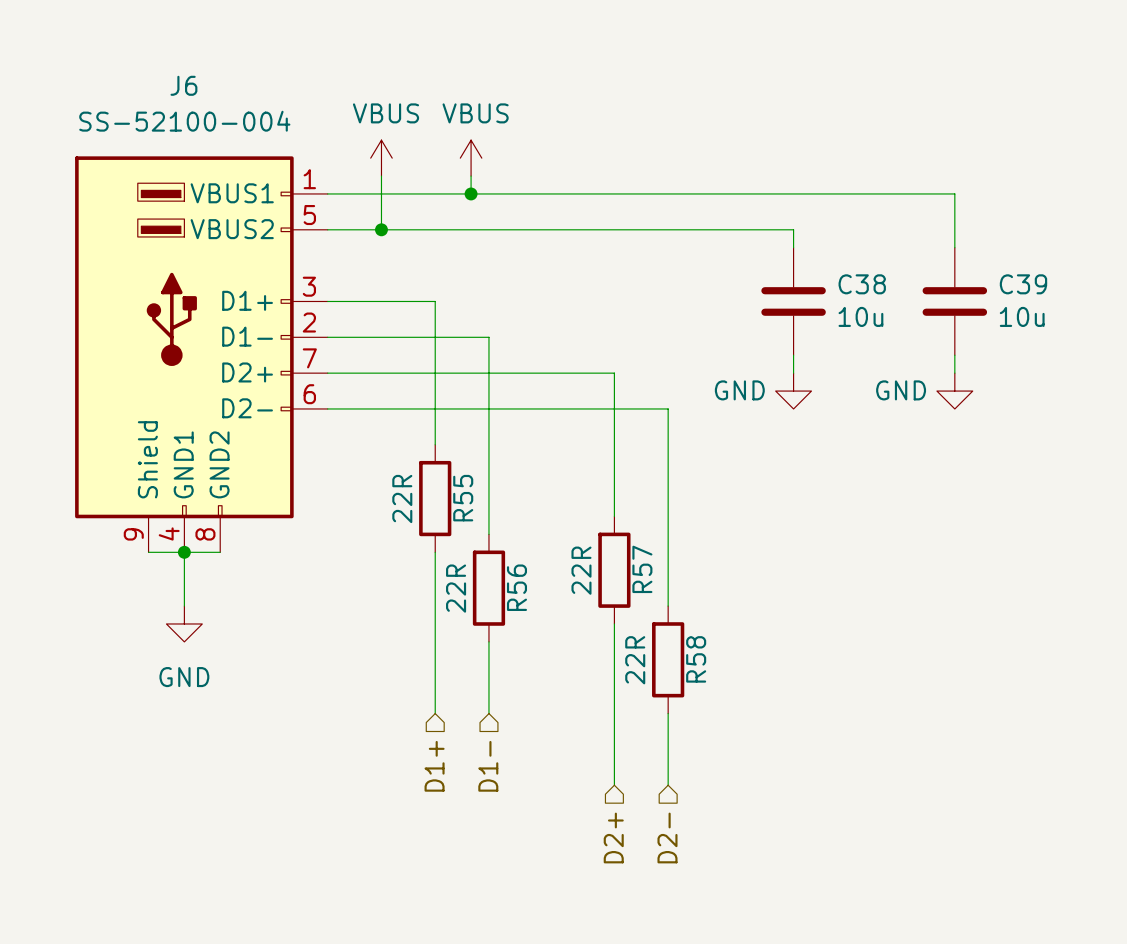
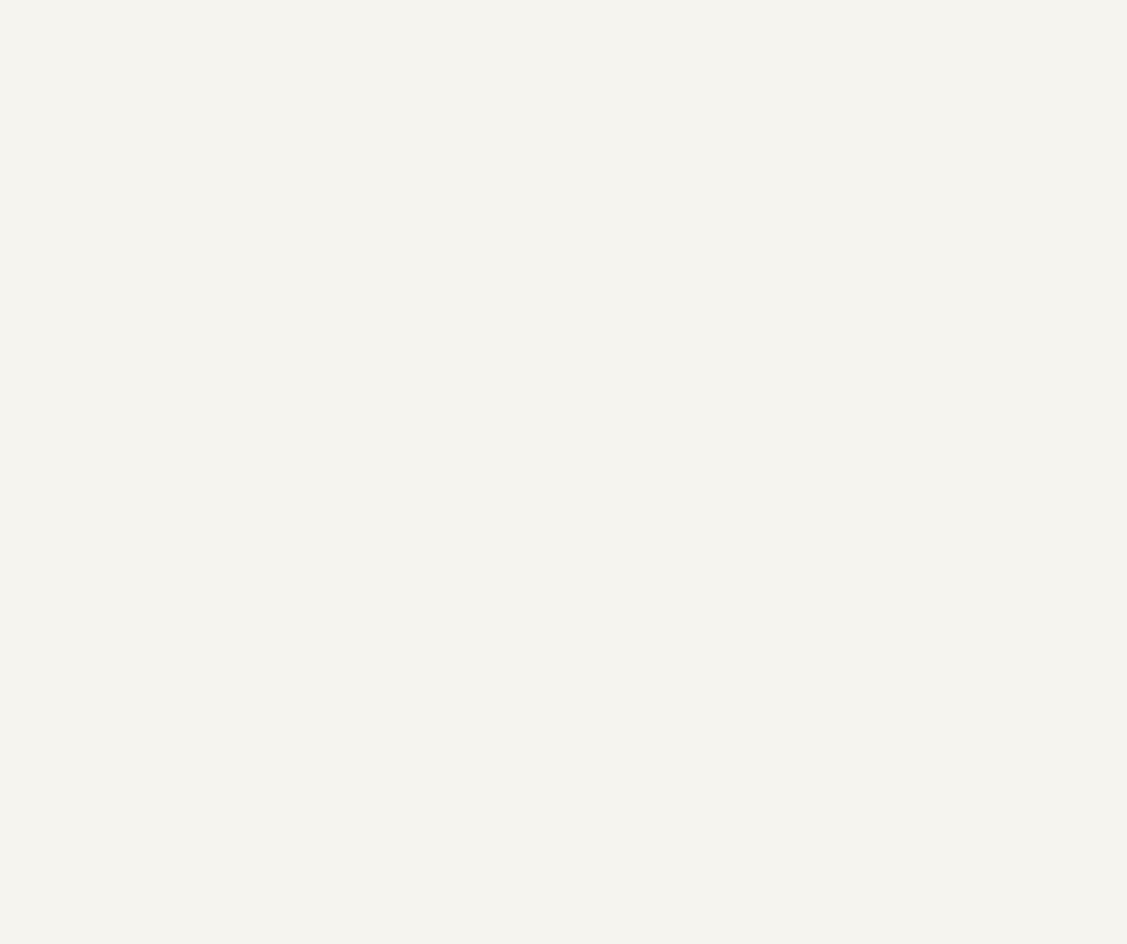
power symbol: VBUS (381, 158) -> none
power symbol: VBUS (471, 158) -> none
wire: (381, 176) (381, 229) -> none
wire: (471, 176) (471, 193) -> none
wire: (327, 193) (954, 193) (954, 247) -> none
junction: (471, 193) -> none
wire: (327, 229) (793, 229) (793, 247) -> none
junction: (381, 229) -> none
wire: (327, 301) (435, 301) (435, 444) -> none
C38: 10u (793, 301) -> none
C39: 10u (954, 301) -> none
wire: (327, 337) (488, 337) (488, 534) -> none
J6: SS-52100-004 (201, 354) -> none
wire: (793, 355) (793, 373) -> none
wire: (954, 355) (954, 373) -> none
wire: (327, 373) (614, 373) (614, 516) -> none
power symbol: GND (793, 391) -> none
power symbol: GND (954, 391) -> none
wire: (327, 408) (668, 408) (668, 606) -> none
R55: 22R (435, 498) -> none
wire: (148, 552) (220, 552) -> none
wire: (184, 552) (184, 606) -> none
junction: (184, 552) -> none
wire: (435, 552) (435, 713) -> none
R57: 22R (614, 570) -> none
R56: 22R (488, 588) -> none
power symbol: GND (184, 623) -> none
wire: (614, 623) (614, 785) -> none
wire: (488, 641) (488, 713) -> none
R58: 22R (668, 659) -> none
wire: (668, 713) (668, 785) -> none
hierarchical label: D1+ (434, 766) -> none
hierarchical label: D1- (488, 766) -> none
hierarchical label: D2+ (613, 837) -> none
hierarchical label: D2- (667, 837) -> none

